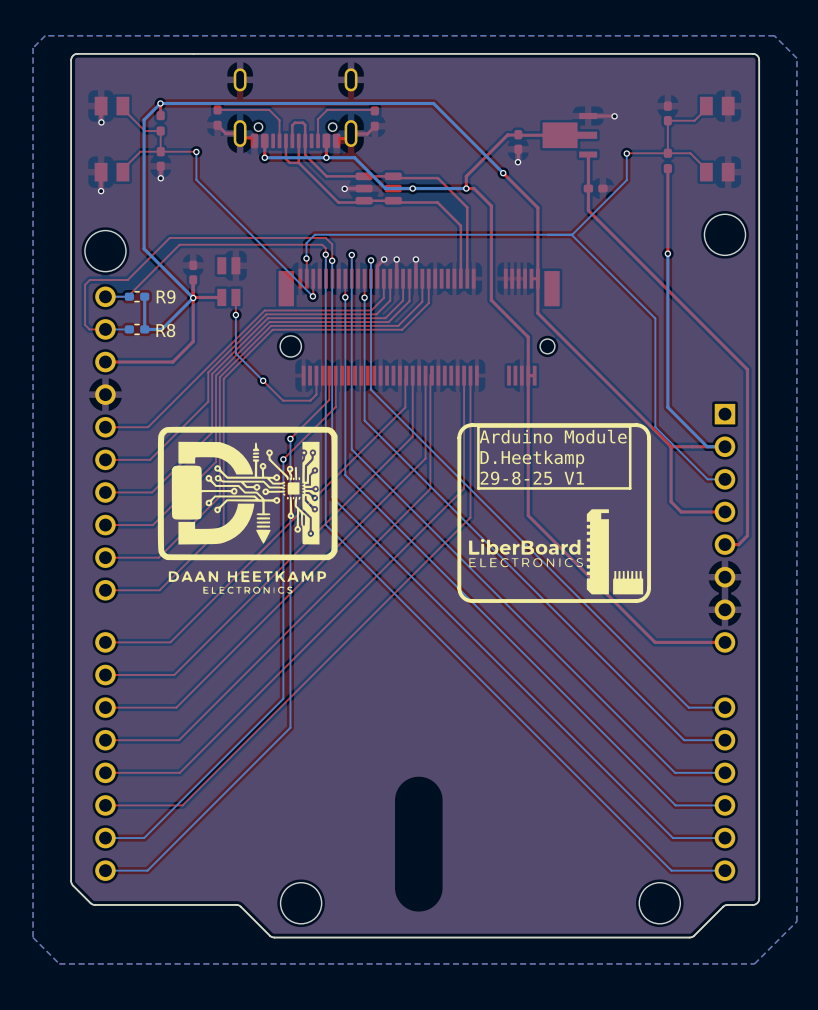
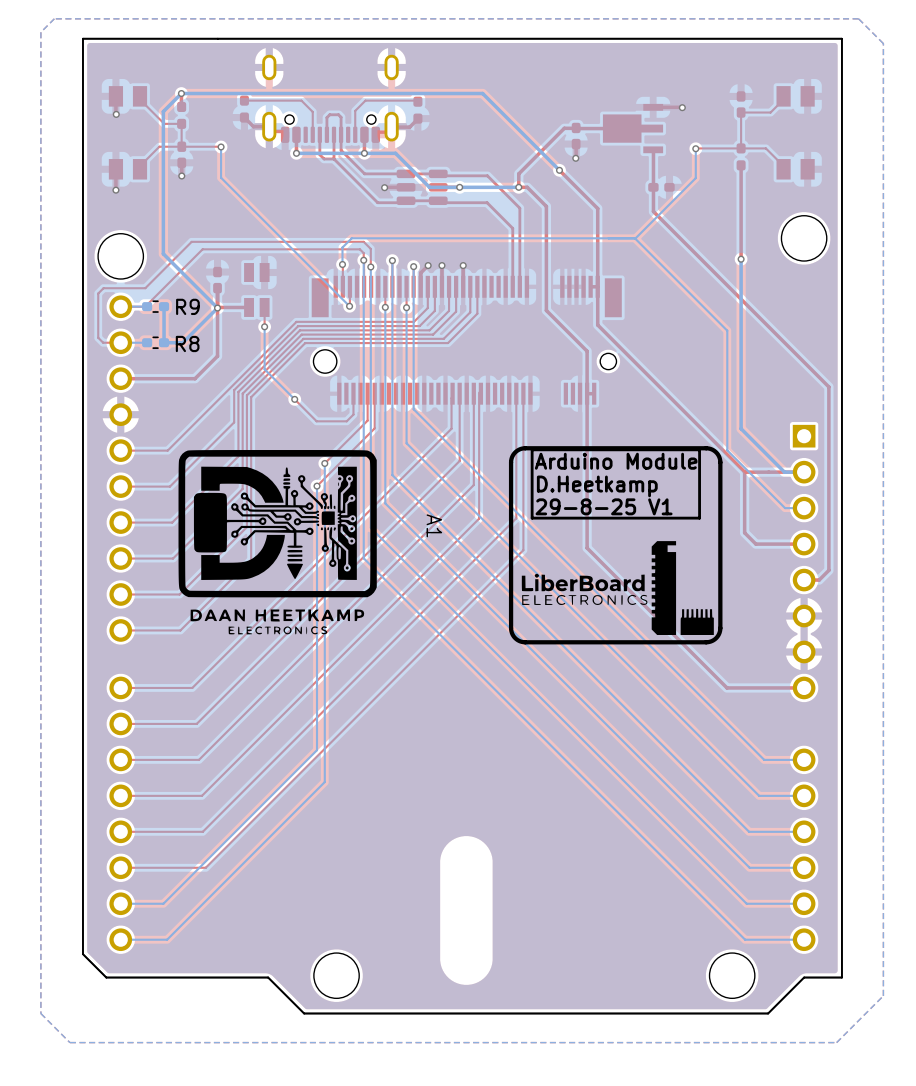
part: (415, 495) -> none
A1: none -> (462, 526)

